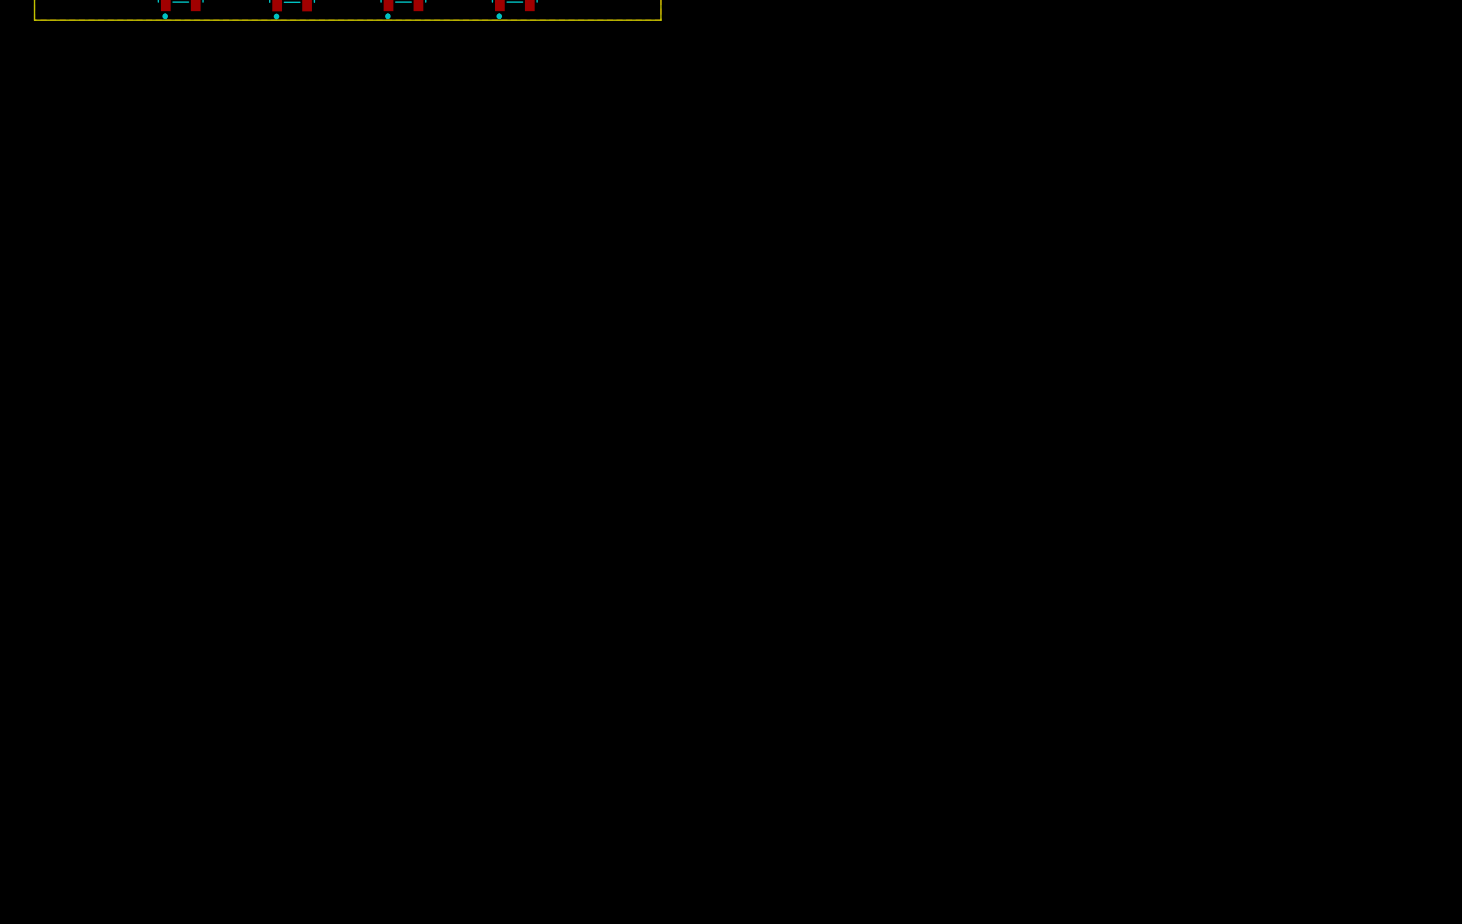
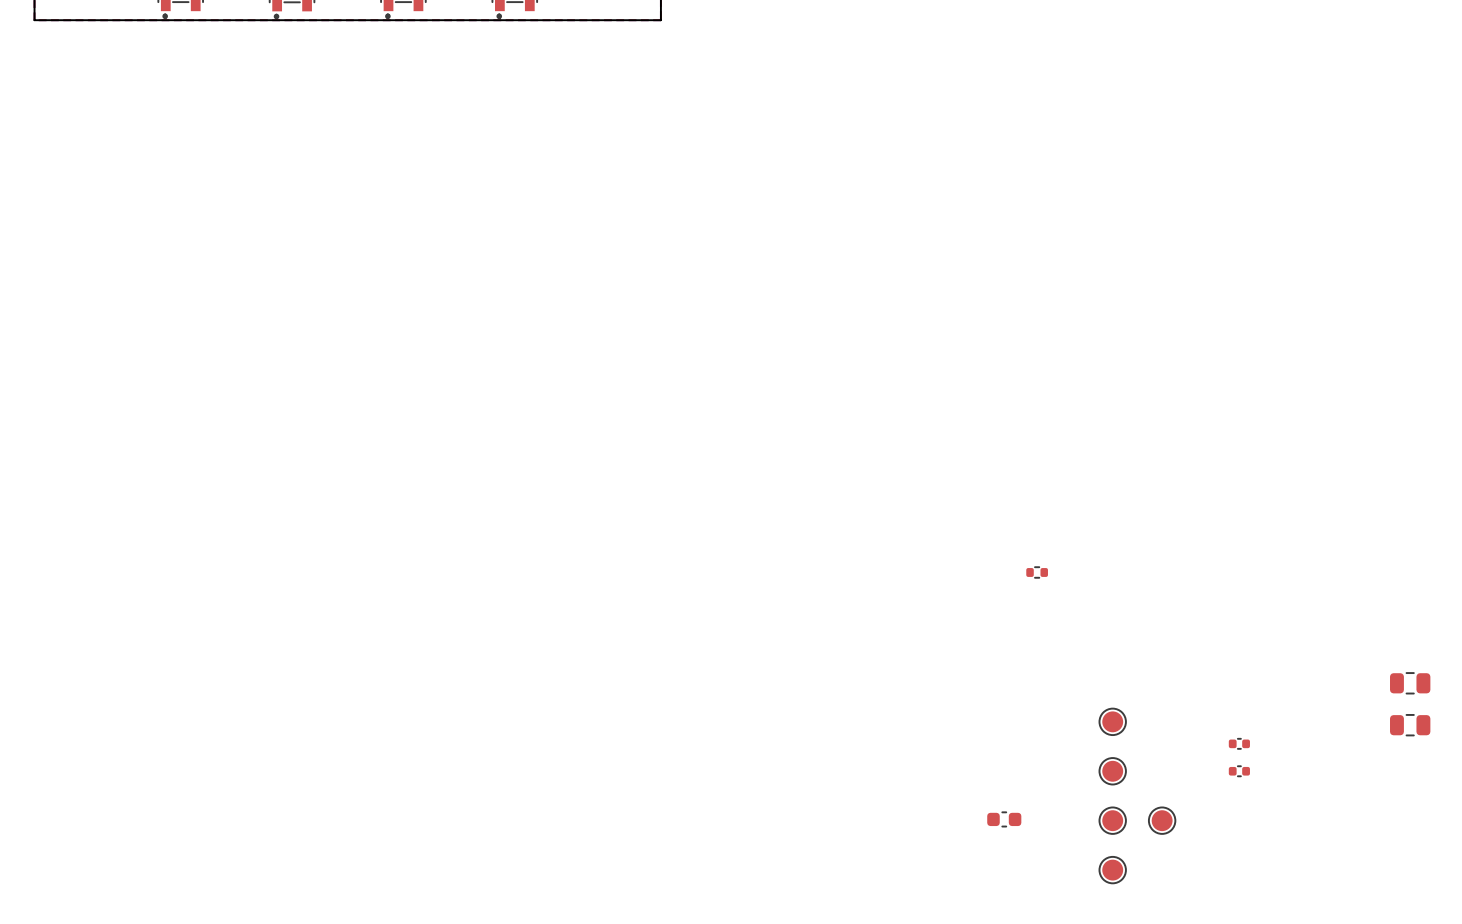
part: none -> (1037, 572)
part: none -> (1410, 683)
part: none -> (1112, 721)
part: none -> (1410, 725)
part: none -> (1239, 743)
part: none -> (1112, 771)
part: none -> (1239, 771)
part: none -> (1004, 819)
part: none -> (1112, 820)
part: none -> (1162, 820)
part: none -> (1112, 870)

